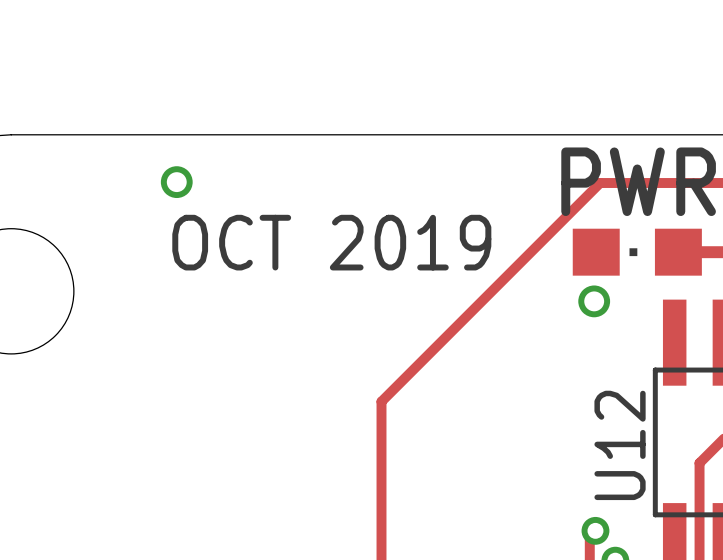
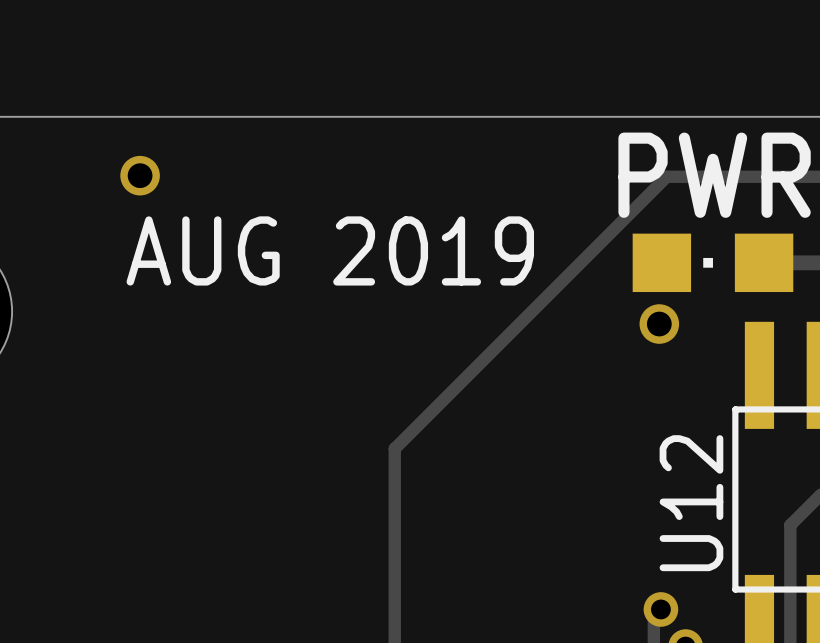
text: OCT 2019 (331, 242) -> AUG 2019 (330, 250)

